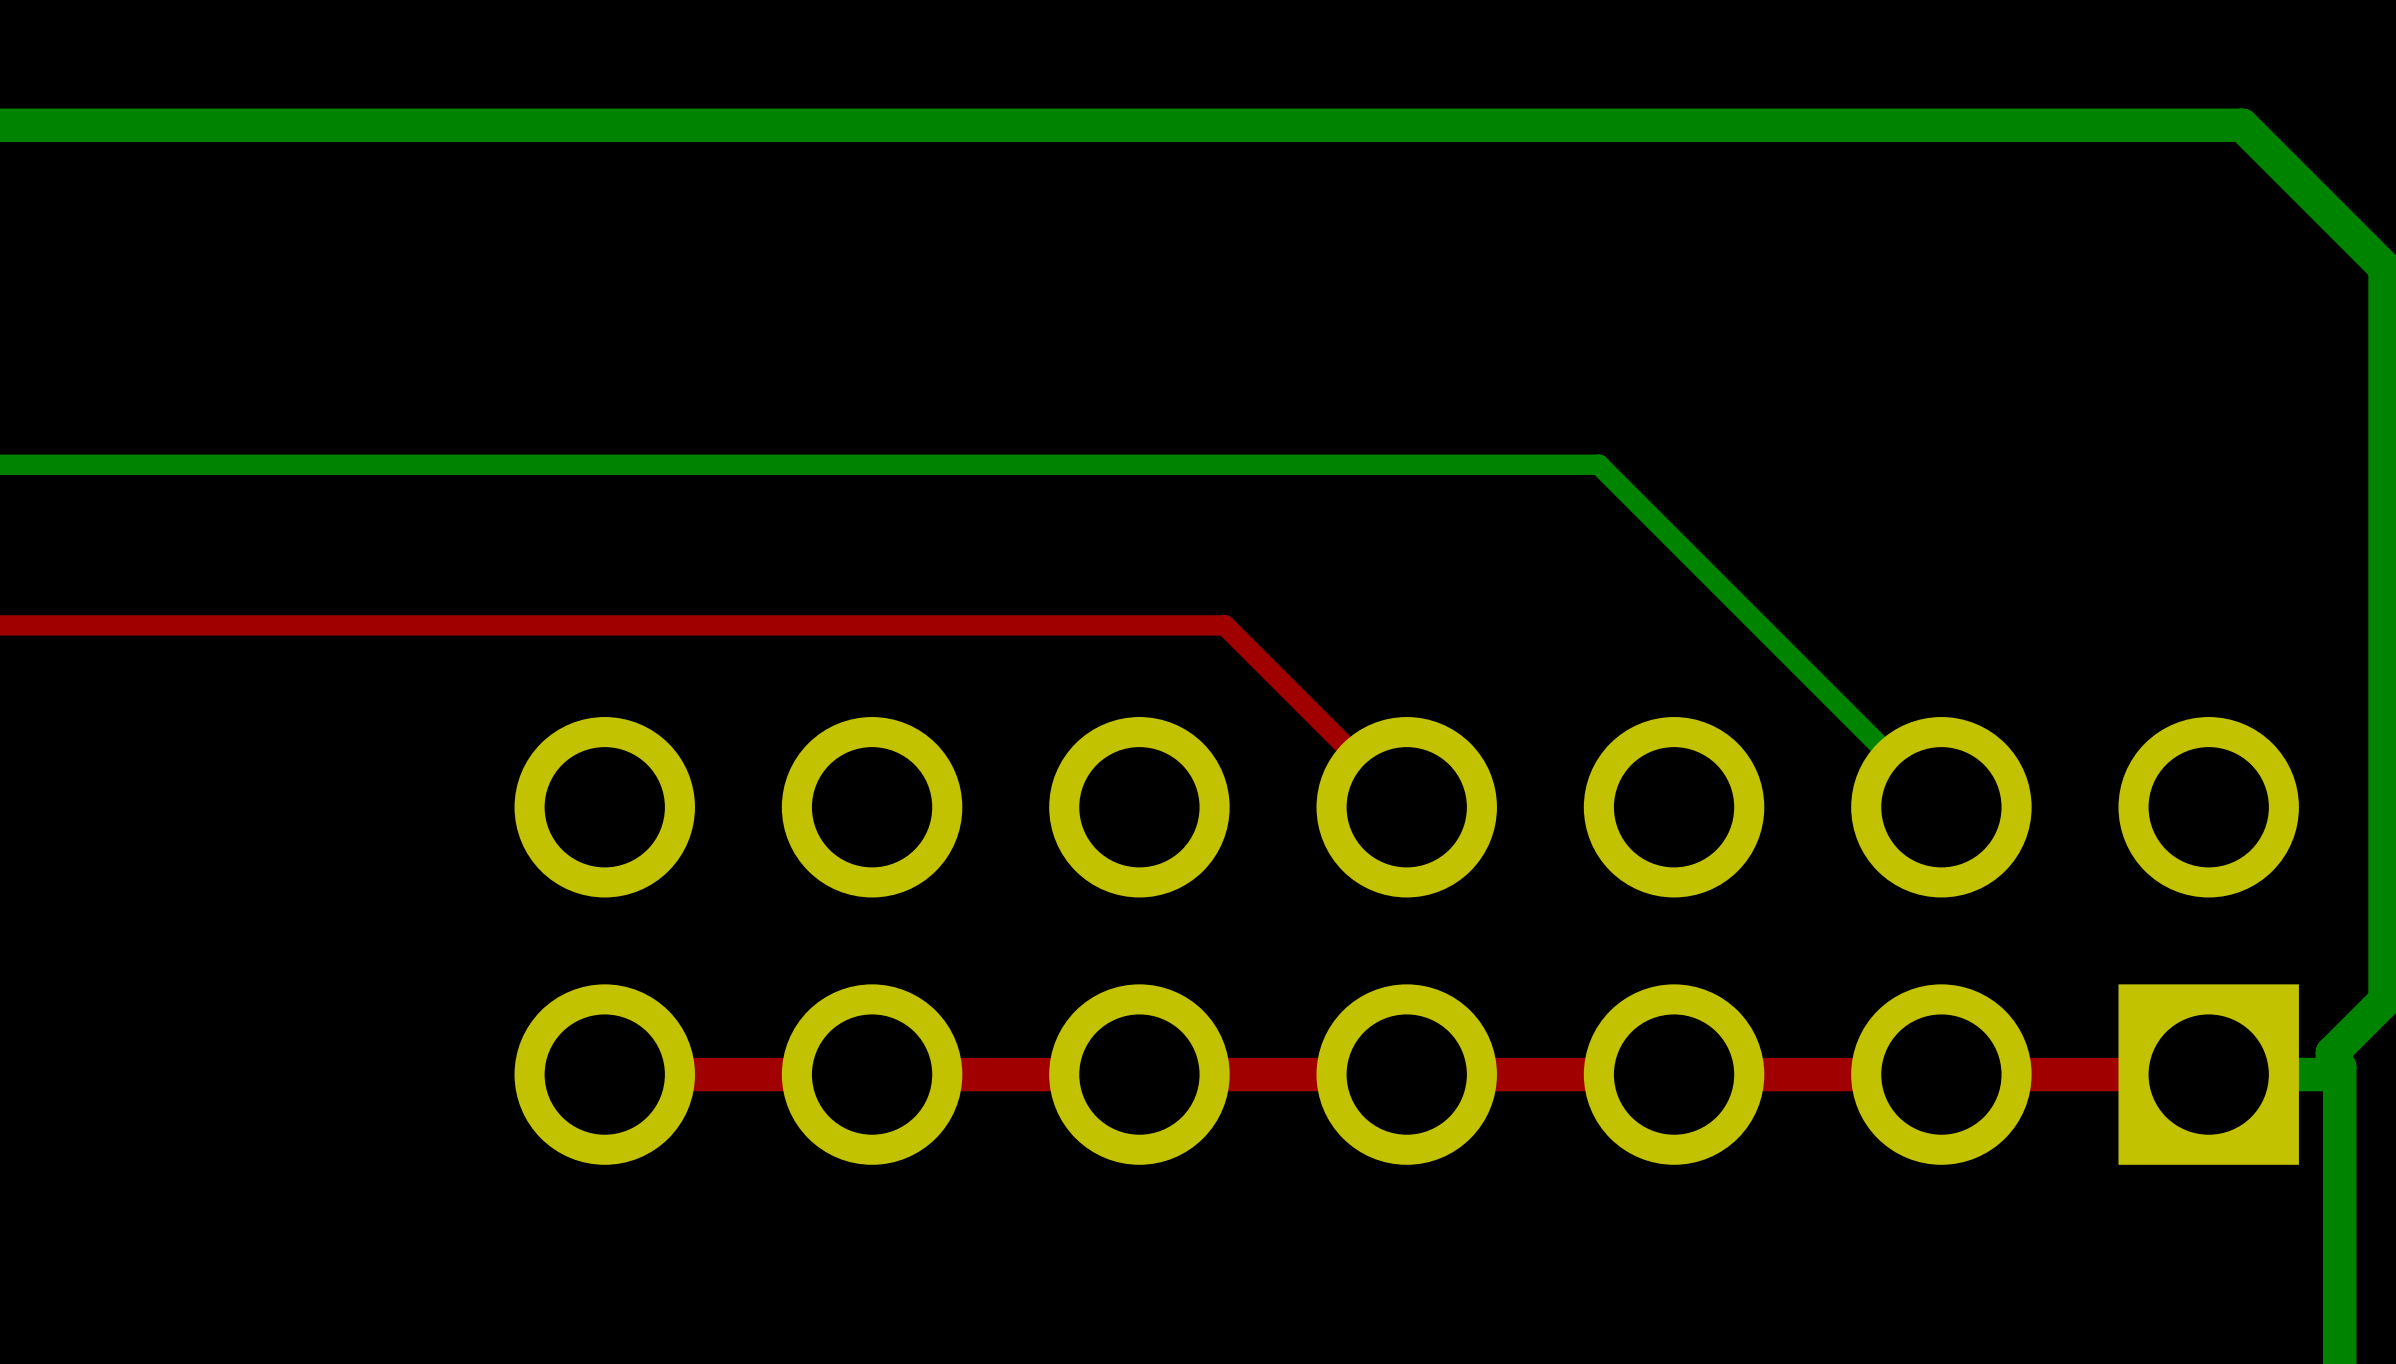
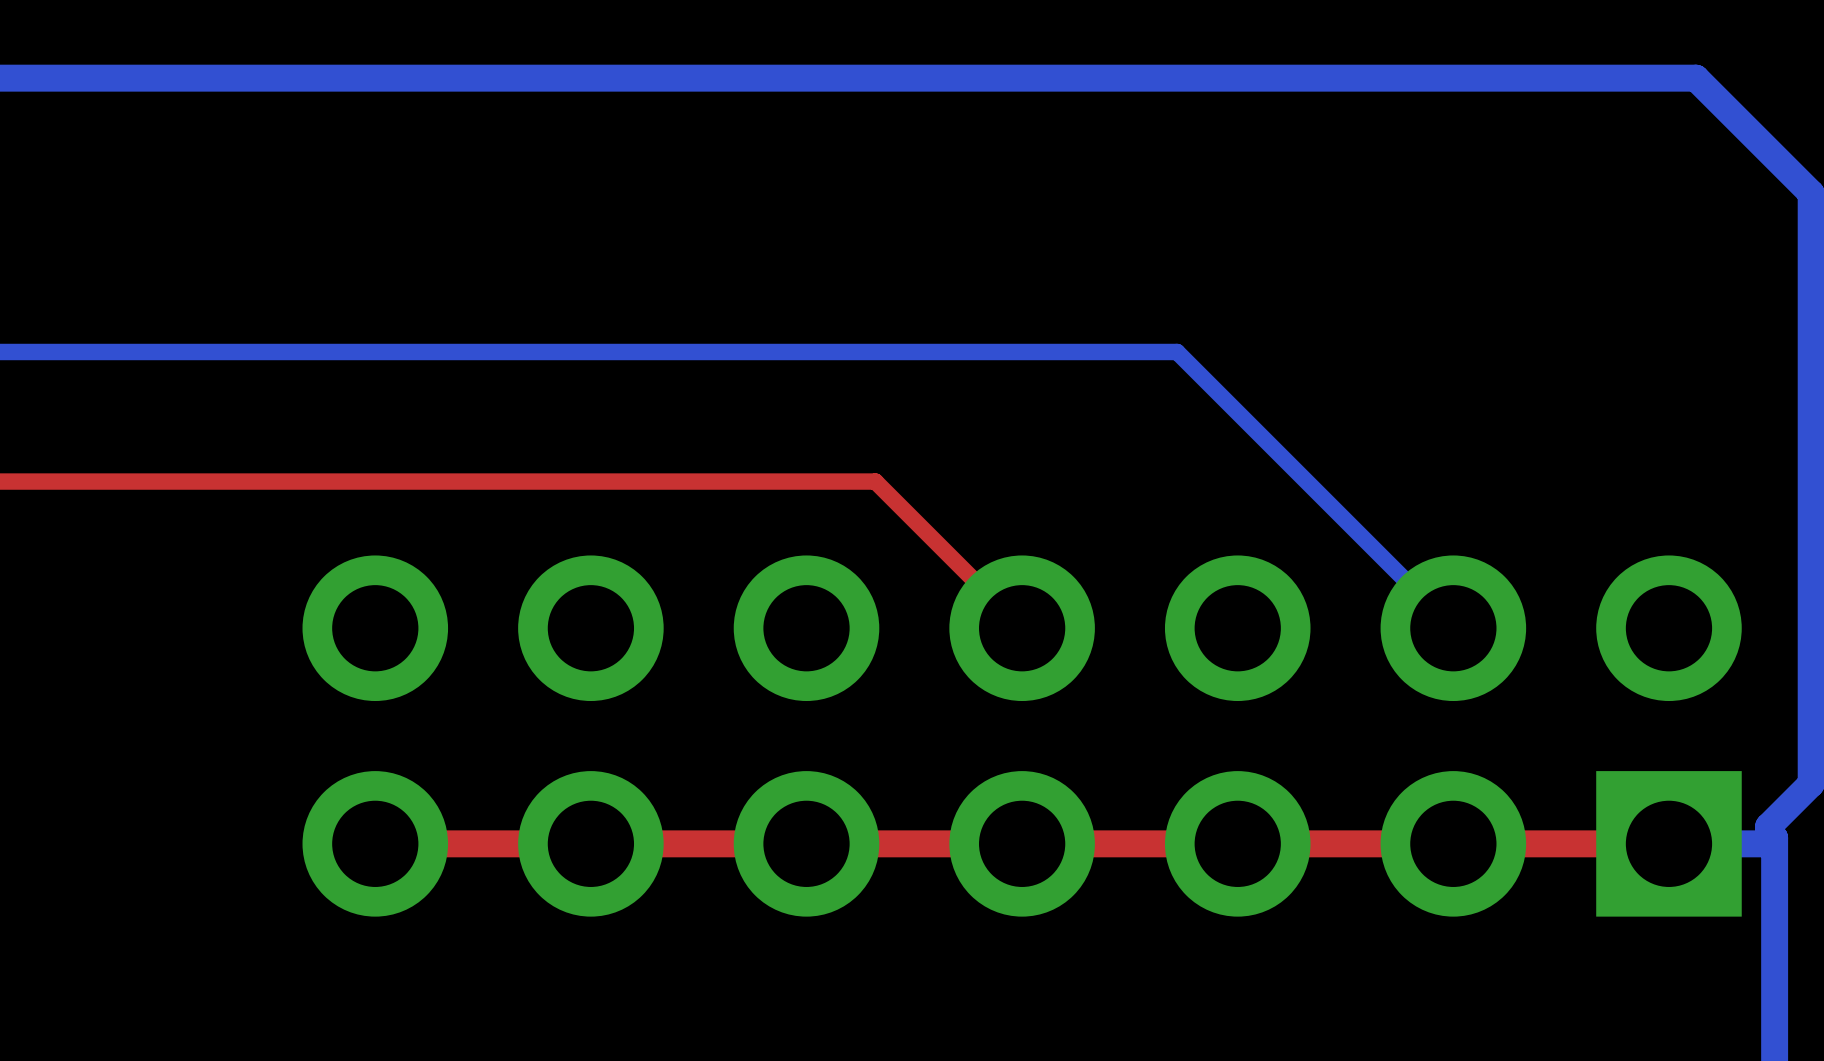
part footprint: [514, 717, 2299, 1165] -> [302, 555, 1742, 917]

